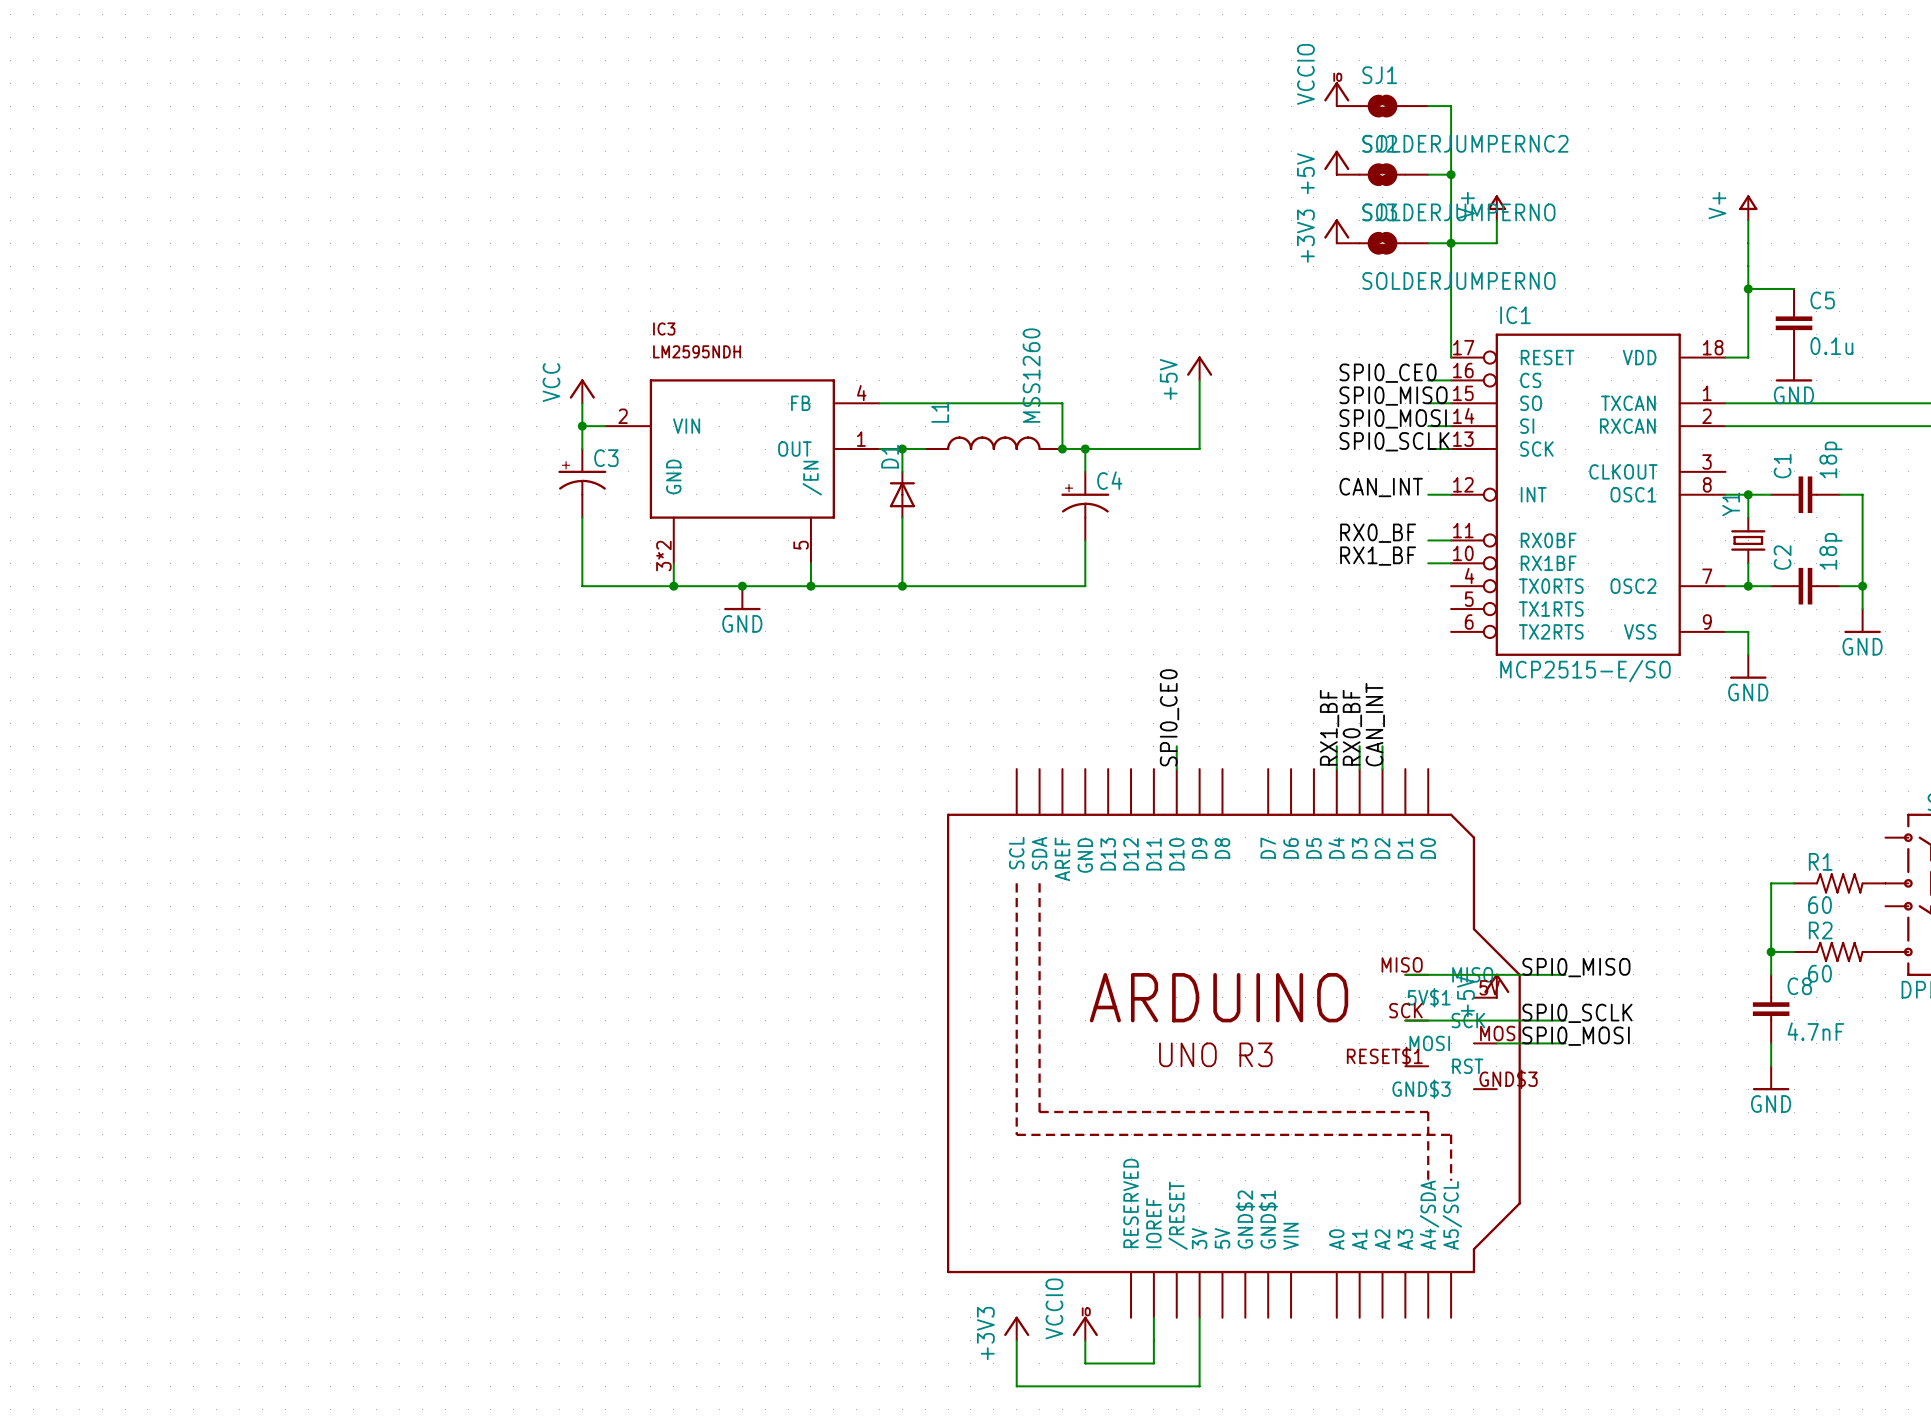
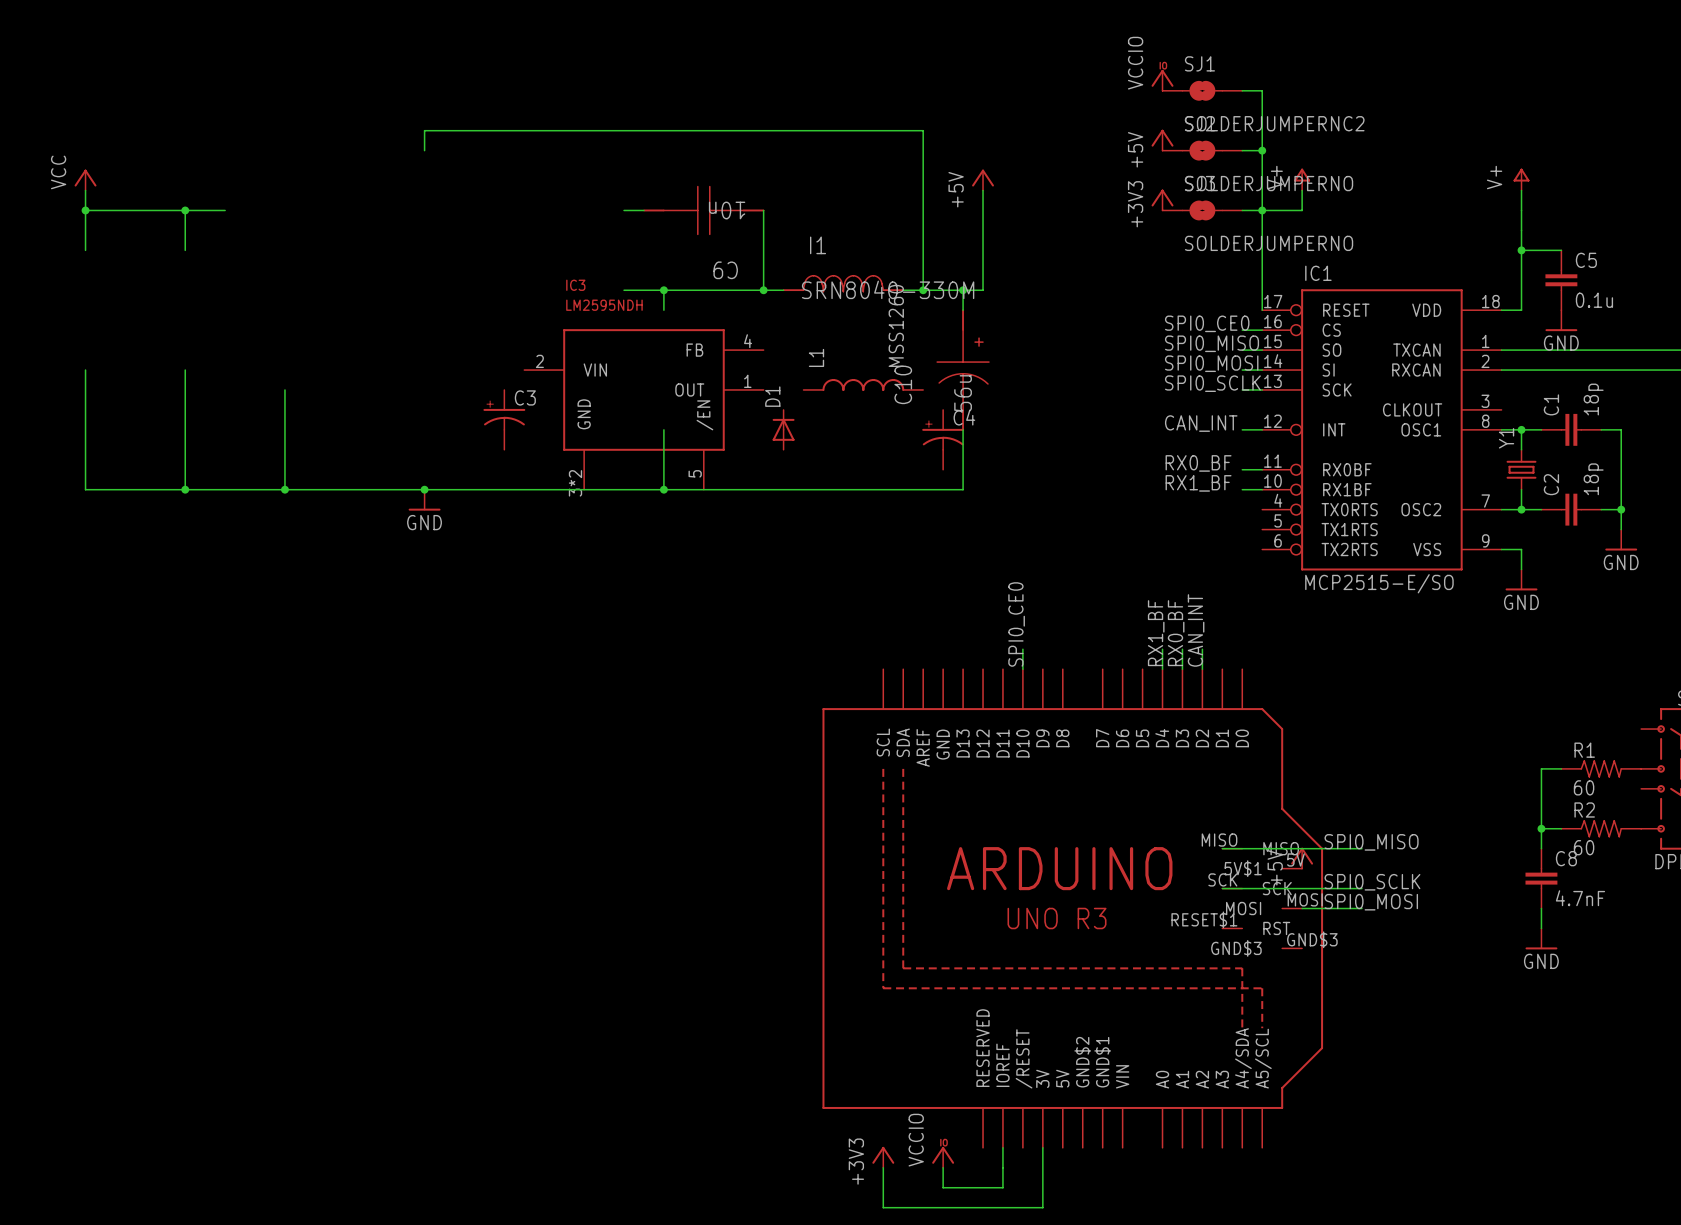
wire: none -> (424, 150) (424, 130) (923, 130) (923, 290)
power symbol: none -> VCC (85, 180)
wire: none -> (85, 190) (85, 250)
wire: none -> (983, 190) (983, 290) (903, 290)
wire: none -> (85, 210) (225, 210)
junction: none -> (85, 210)
wire: none -> (185, 210) (185, 250)
junction: none -> (185, 210)
wire: none -> (624, 210) (643, 210)
C9: none -> 10n (703, 210)
wire: none -> (763, 210) (763, 290)
I1: none -> SRN8040-330M (843, 283)
wire: none -> (624, 290) (783, 290)
junction: none -> (663, 290)
junction: none -> (763, 290)
junction: none -> (923, 290)
junction: none -> (963, 290)
power symbol position: +5V (1199, 368) -> +5V (983, 180)
wire: (1199, 380) (1199, 449) (1062, 449) (1062, 403) (879, 403) -> none
power symbol: VCC (582, 391) -> none
wire: (582, 403) (582, 449) -> none
wire: none -> (85, 370) (85, 489) (963, 489) (963, 429)
wire: none -> (185, 370) (185, 489)
wire: (582, 426) (605, 426) -> none
junction: (582, 426) -> none
C10: none -> 56u (963, 370)
wire: none -> (284, 389) (284, 489)
wire: (879, 449) (925, 449) -> none
wire: (902, 449) (902, 471) -> (663, 290) (663, 310)
junction: (902, 449) -> none
junction: (1062, 449) -> none
wire: (1085, 449) (1085, 471) -> (963, 290) (963, 310)
junction: (1085, 449) -> none
wire: (582, 517) (582, 586) (1085, 586) (1085, 540) -> none
wire: (902, 517) (902, 586) -> (663, 429) (663, 489)
junction: none -> (185, 489)
junction: none -> (284, 489)
junction: none -> (424, 489)
wire: (673, 563) (673, 586) -> none
junction: none -> (663, 489)
wire: (810, 563) (810, 586) -> none
power symbol: none -> GND (424, 500)
junction: (673, 586) -> none
junction: (742, 586) -> none
junction: (810, 586) -> none
junction: (902, 586) -> none
power symbol: GND (742, 598) -> none

